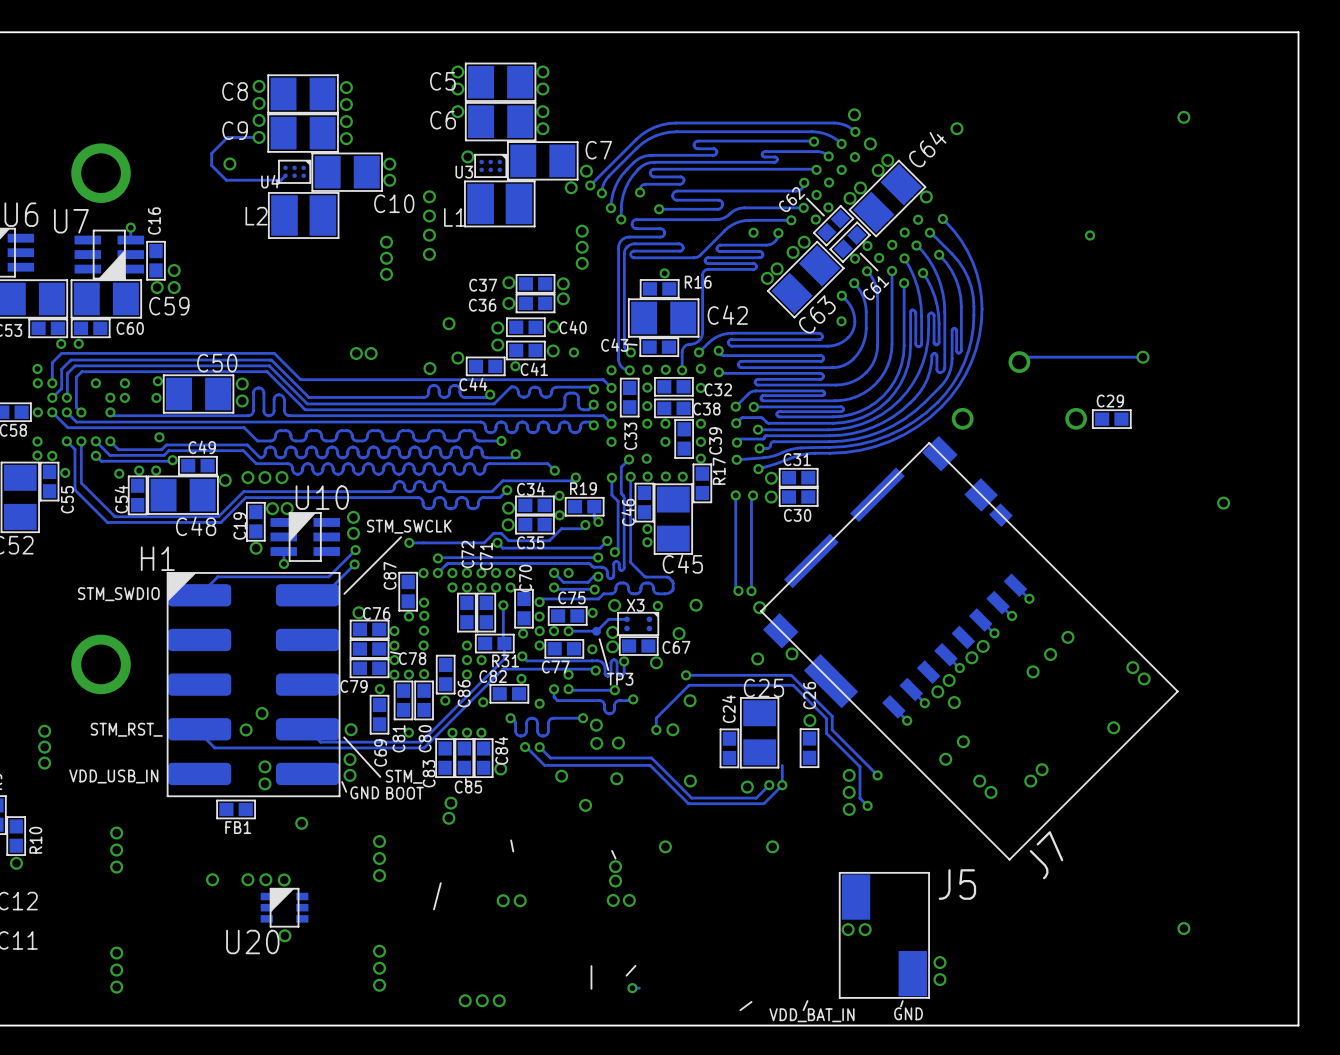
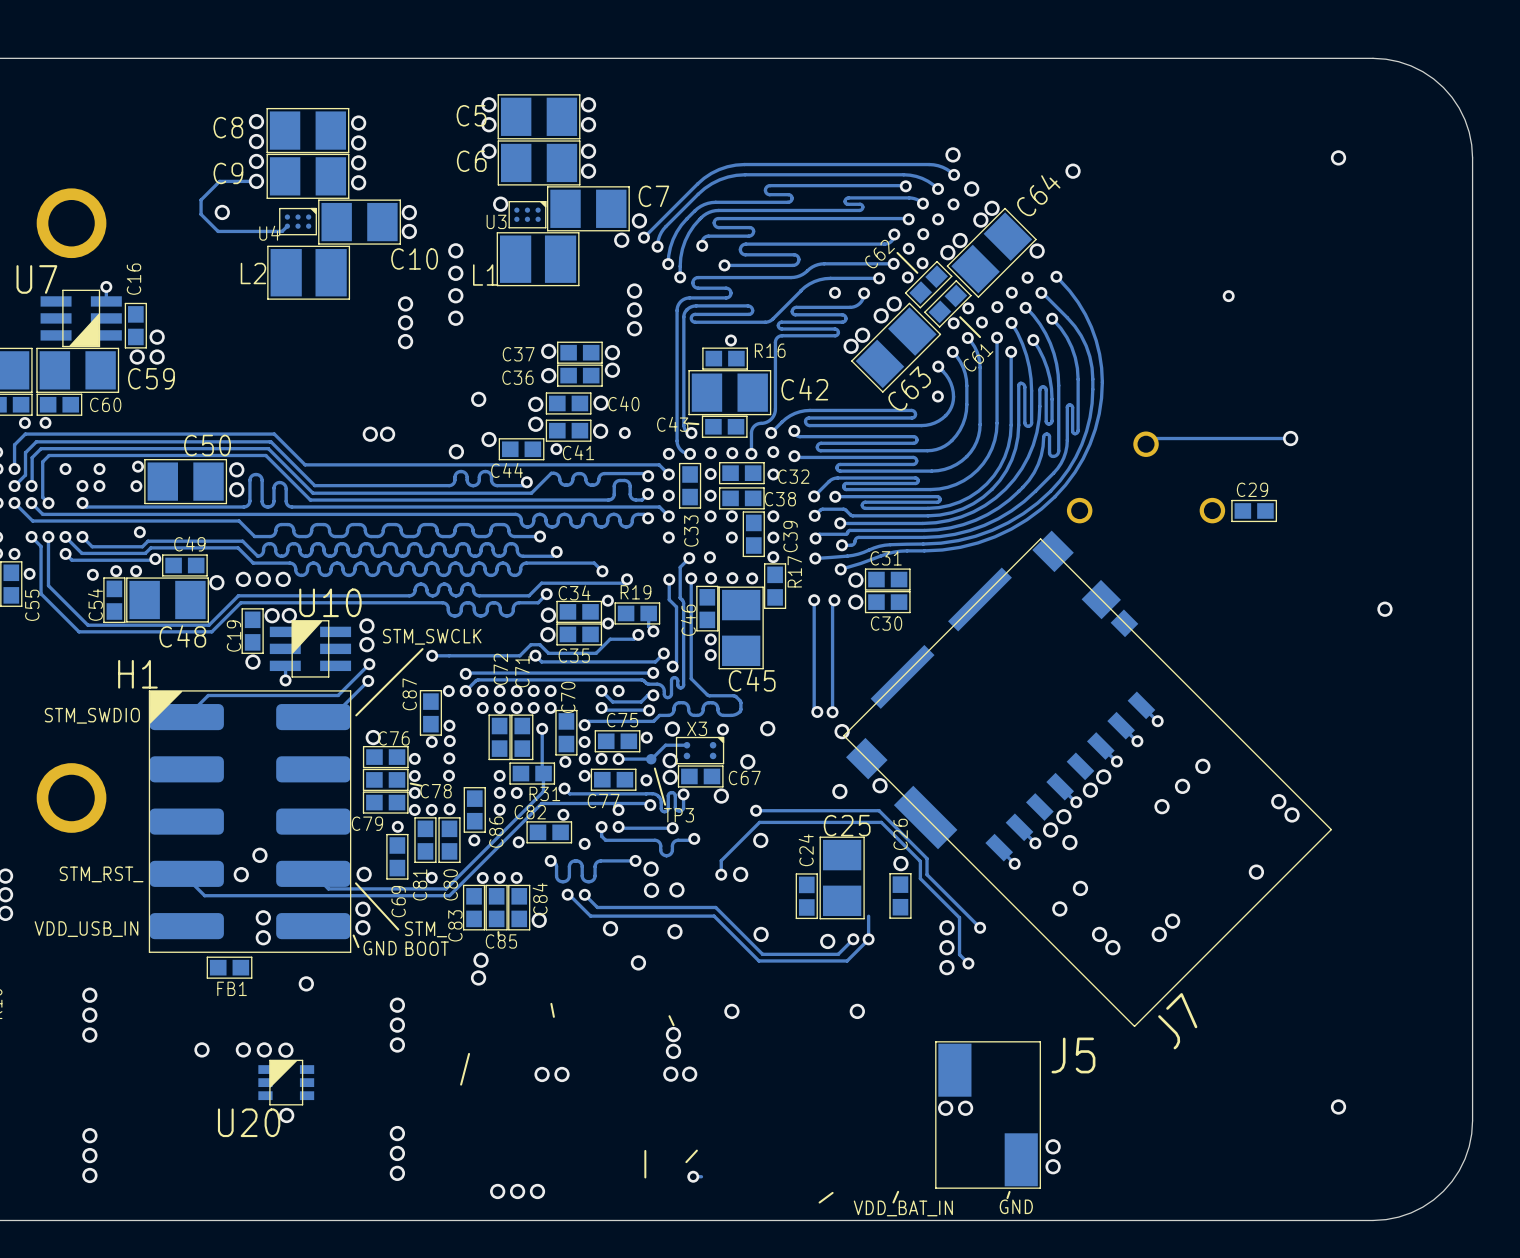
board edge: (1213, 32) (1298, 32) (1298, 117) -> (1373, 58) (1398, 61) (1411, 65) (1422, 71) (1443, 87) (1459, 108) (1465, 119) (1469, 132) (1472, 157)
board edge: (1298, 940) (1298, 1025) (1213, 1025) -> (1472, 1120) (1469, 1146) (1465, 1159) (1459, 1170) (1443, 1191) (1422, 1207) (1411, 1212) (1398, 1217) (1373, 1220)

